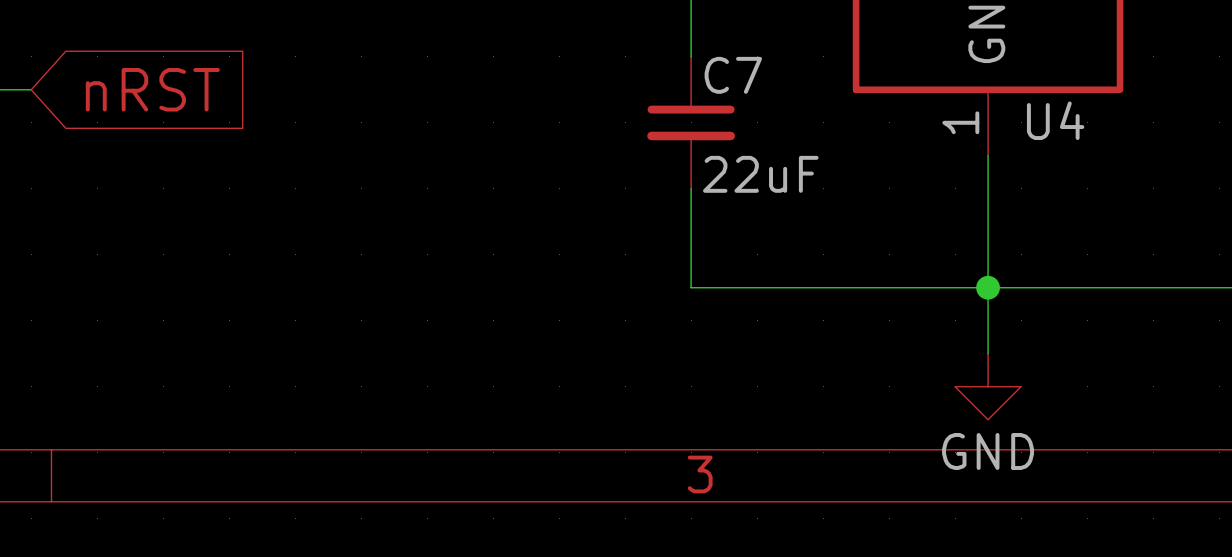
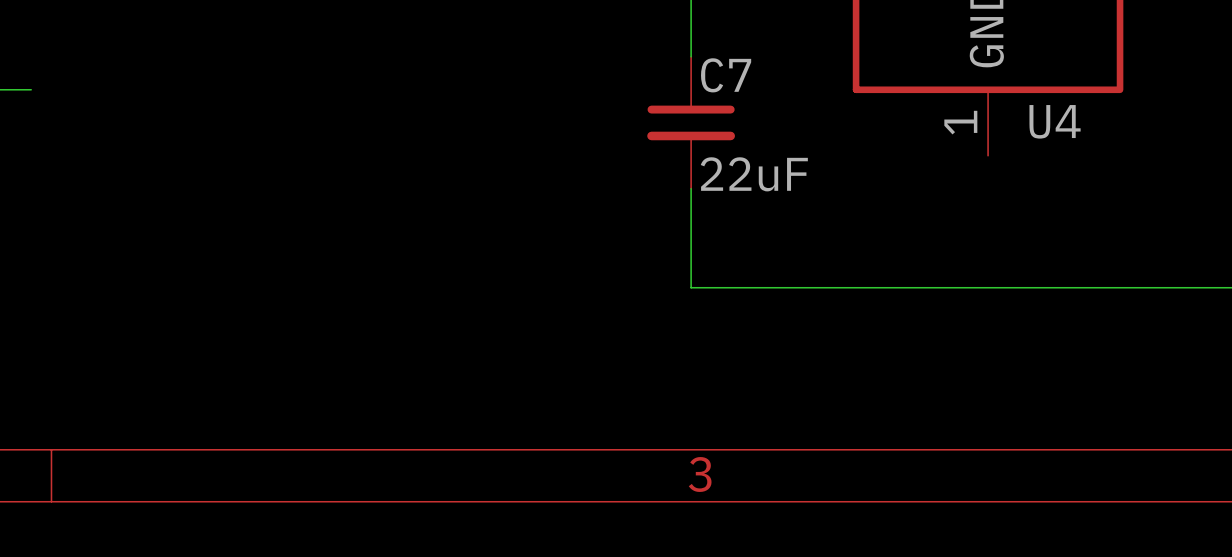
global label: nRST (152, 89) -> none
wire: (988, 155) (988, 353) -> none
junction: (988, 287) -> none
power symbol: GND (988, 386) -> none

